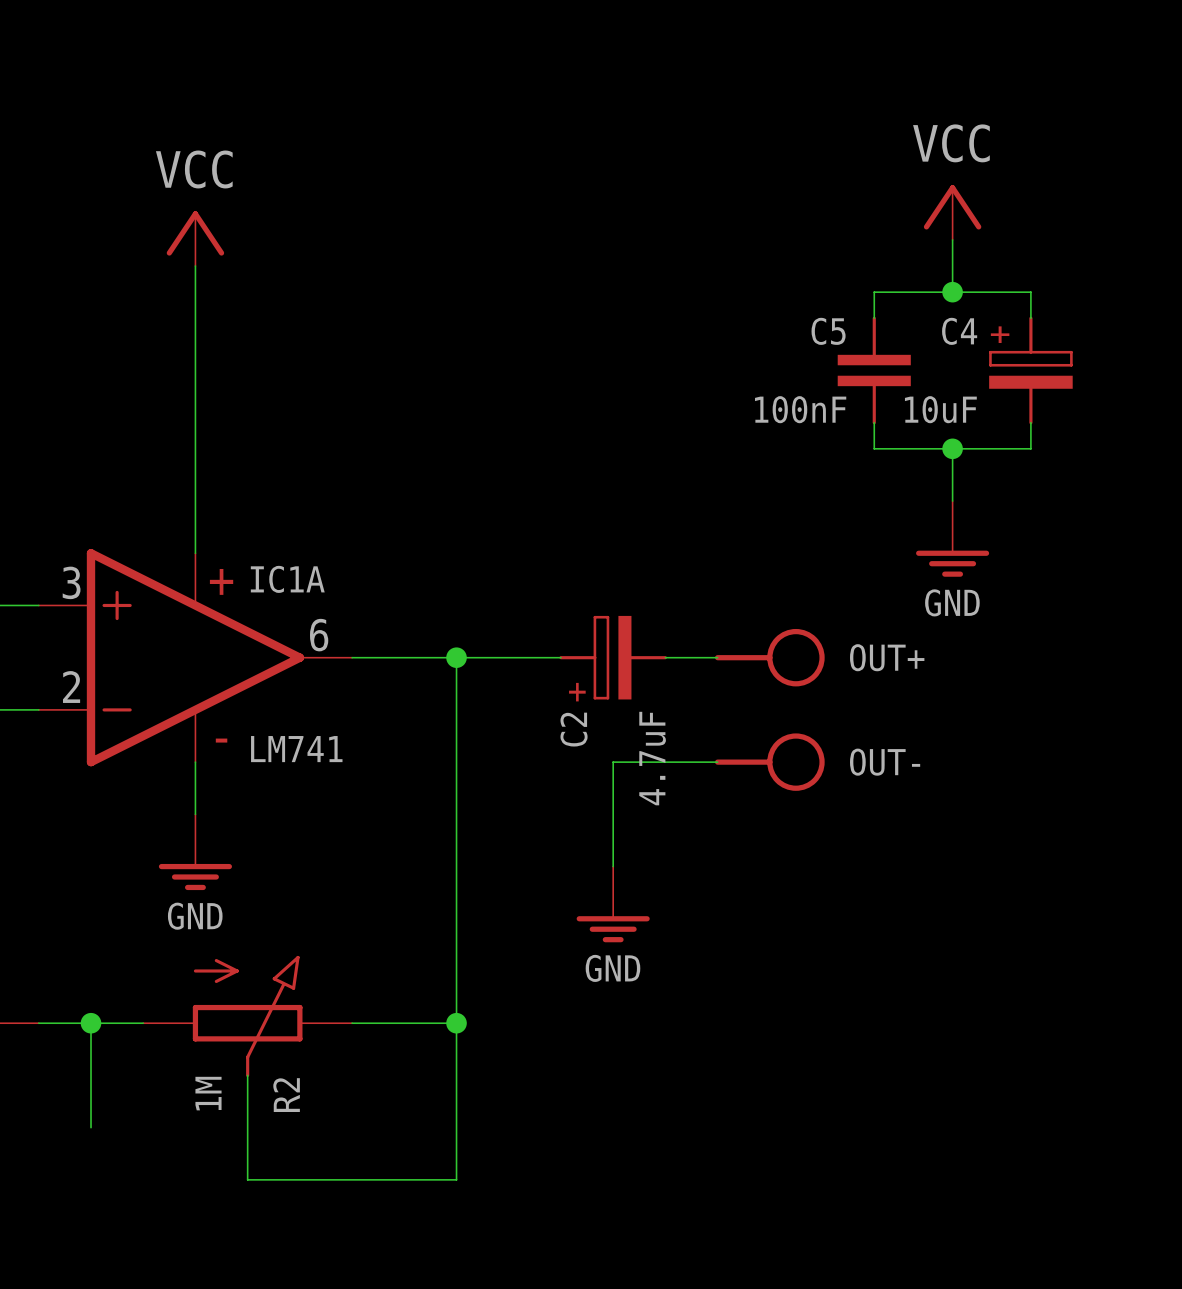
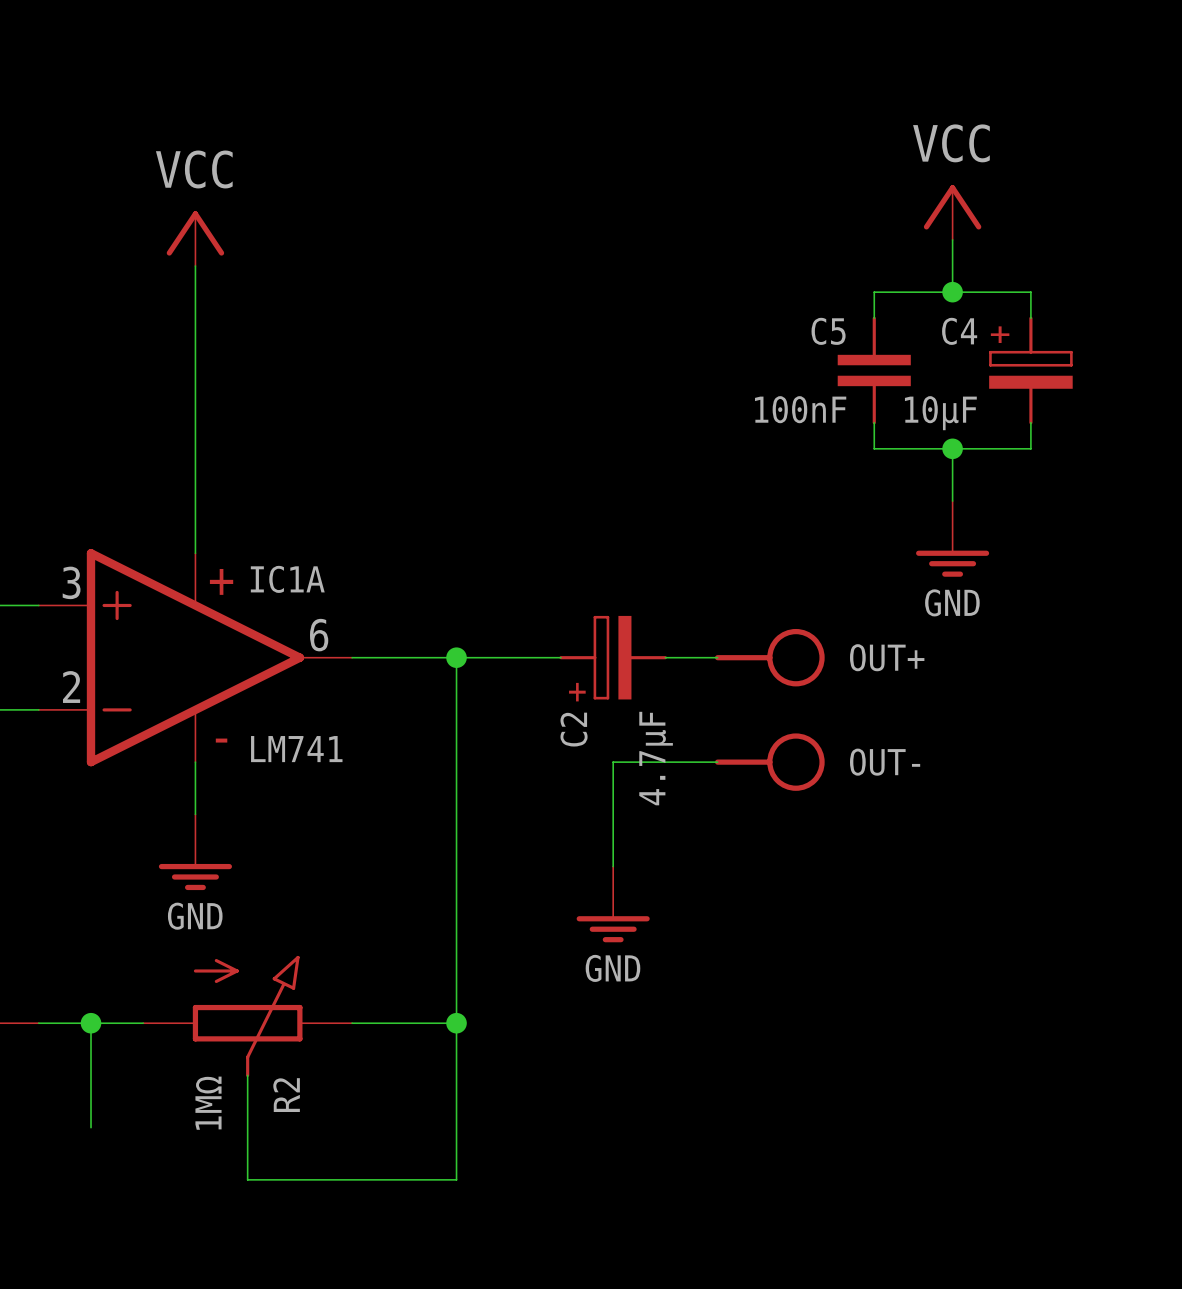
C4 value: 10uF (940, 409) -> 10μF (940, 413)
C2 value: 4.7uF (652, 758) -> 4.7μF (656, 758)
R2 value: 1M (208, 1093) -> 1MΩ (208, 1103)

